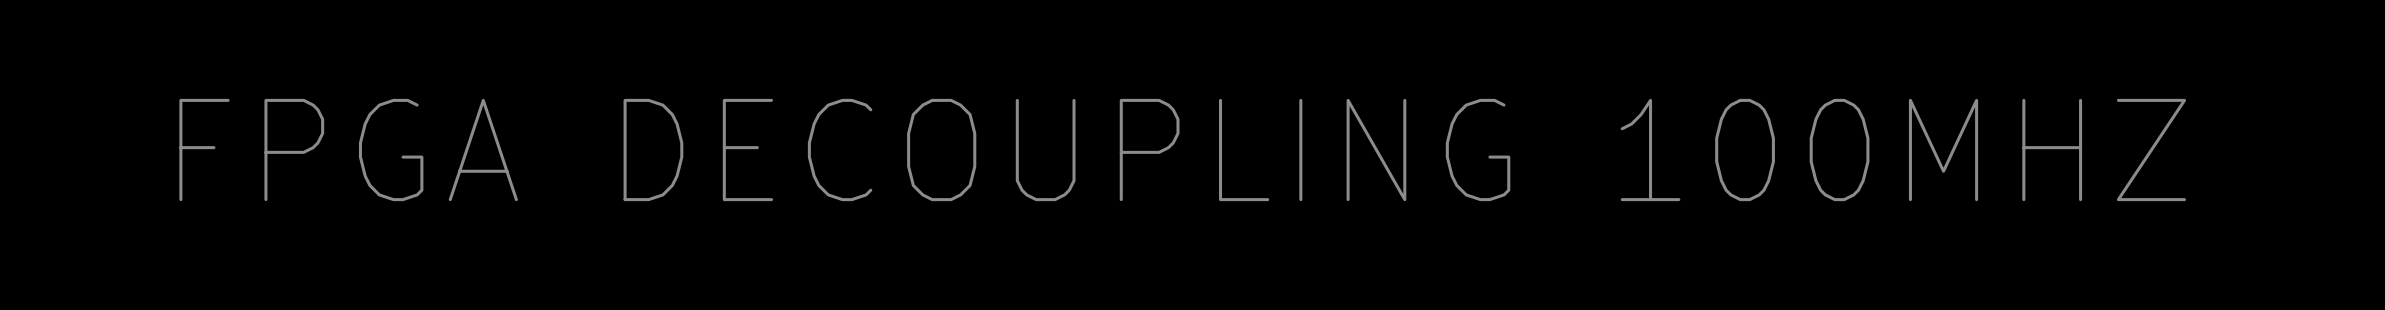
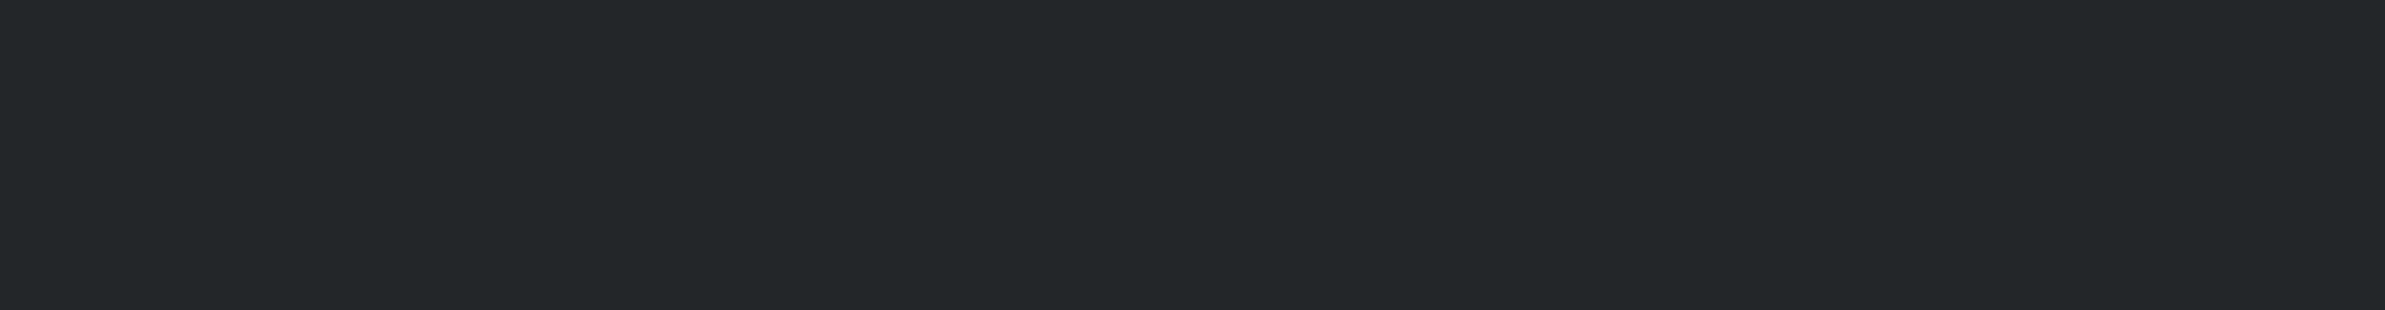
text: FPGA DECOUPLING 100MHZ (1182, 150) -> none

